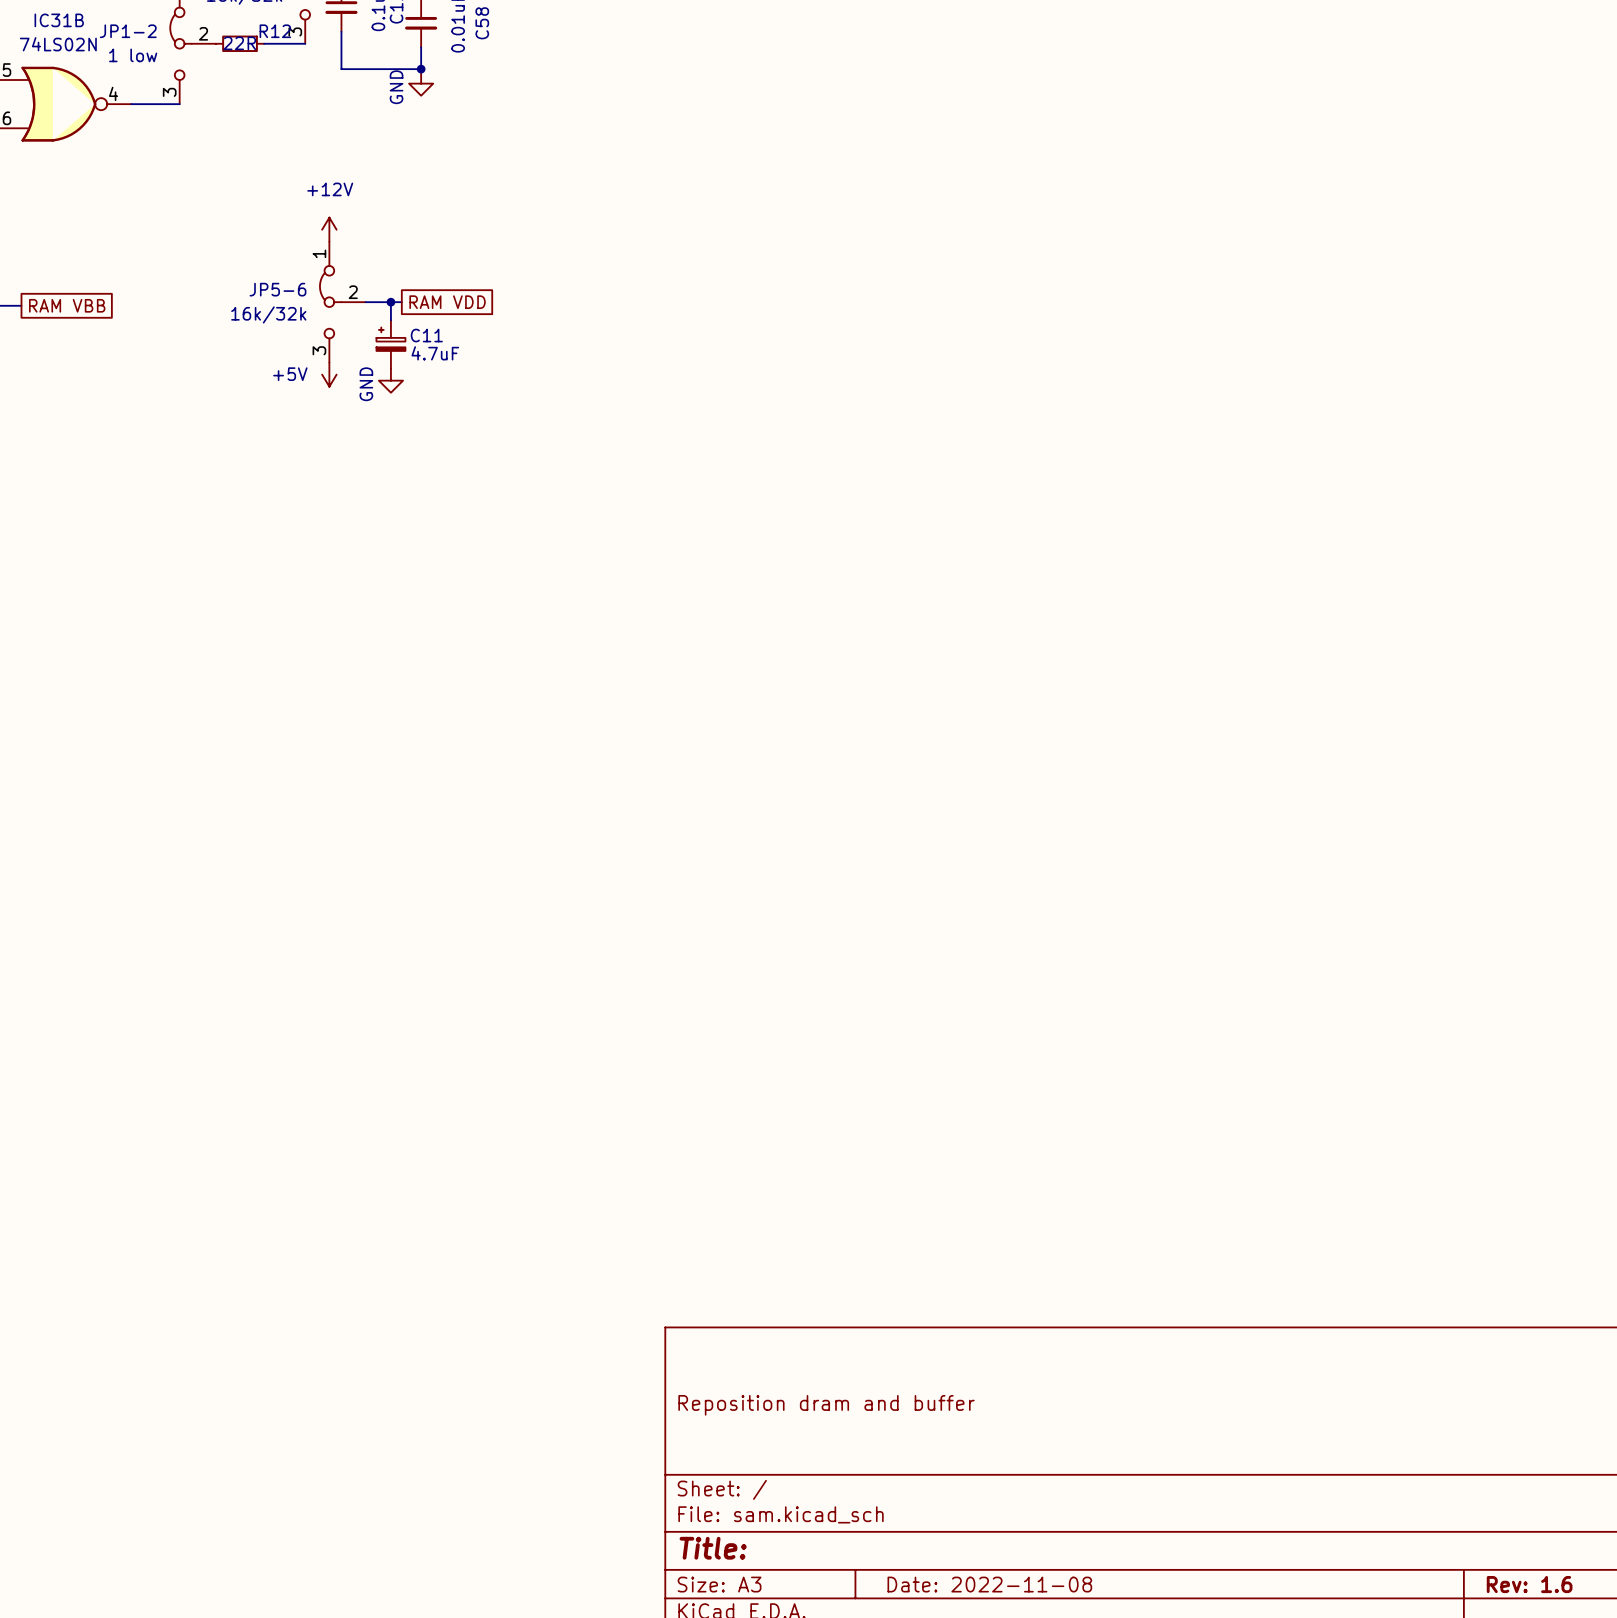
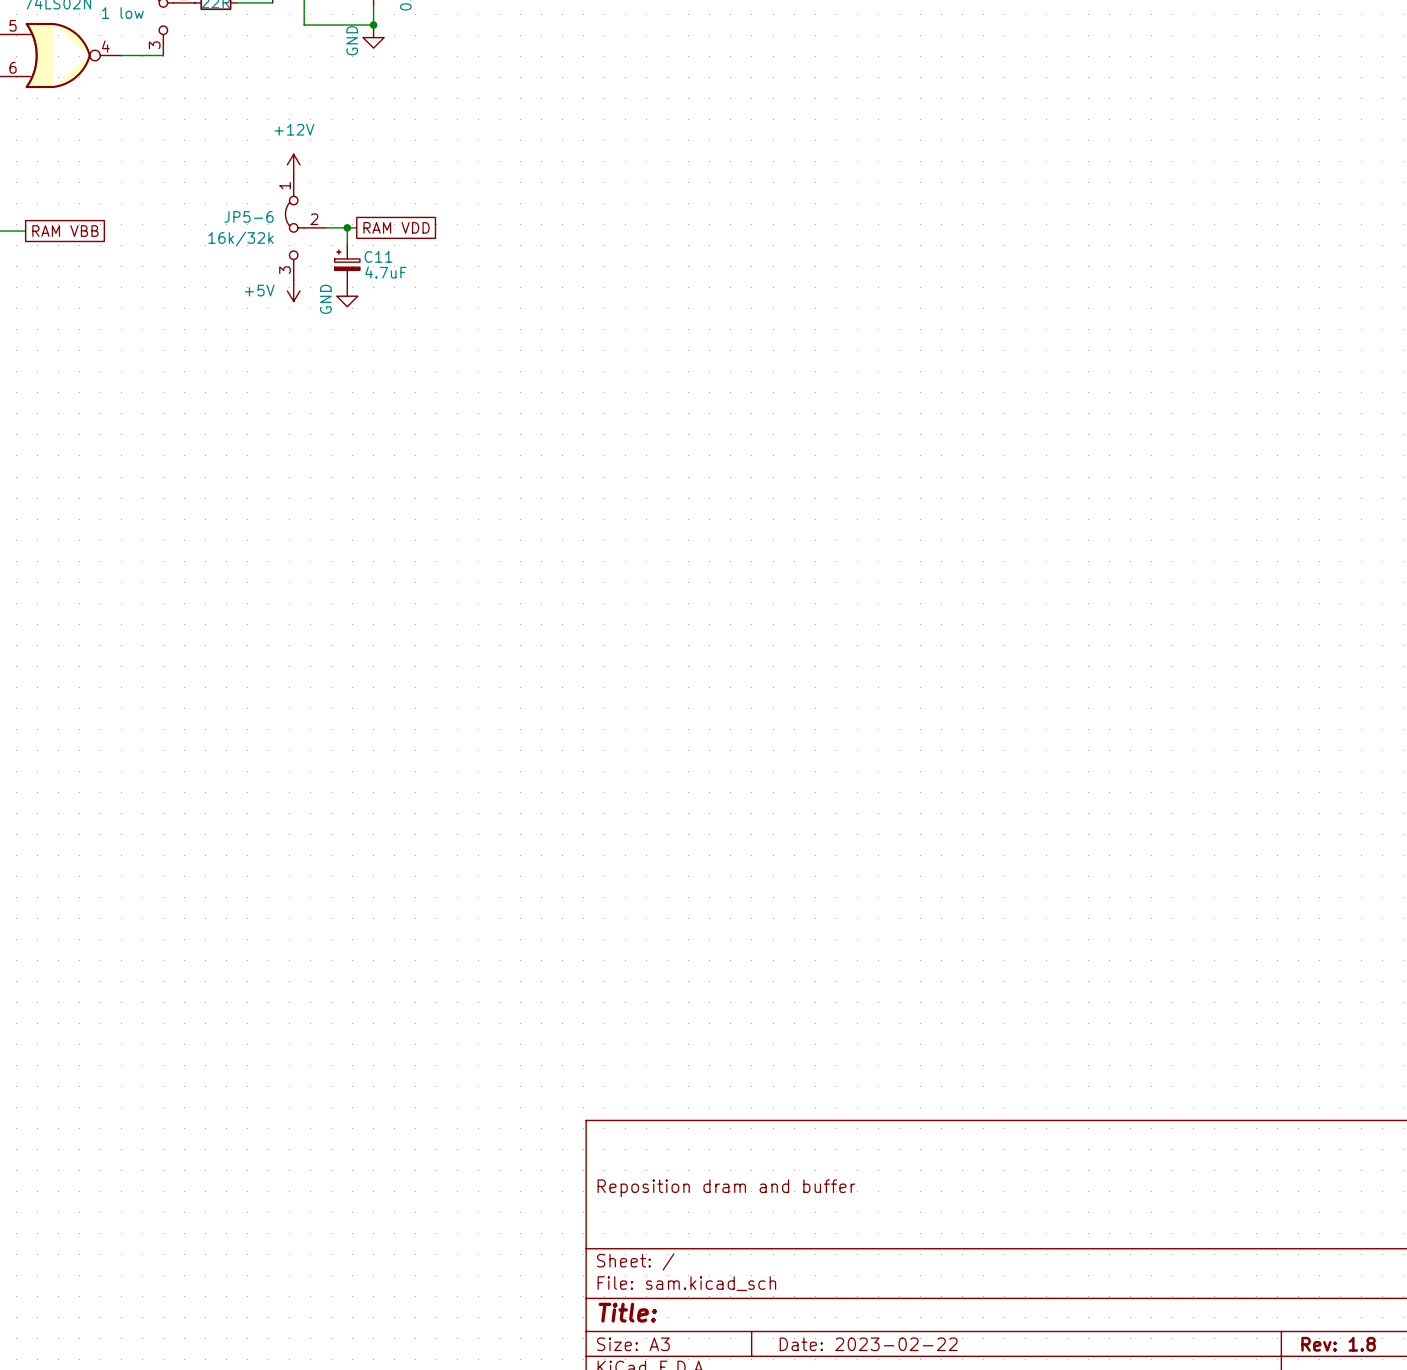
title block: Date: 2022-11-08 (989, 1584) -> Date: 2023-02-22 (868, 1344)
title block: Rev: 1.6 (1529, 1584) -> Rev: 1.8 (1338, 1344)

